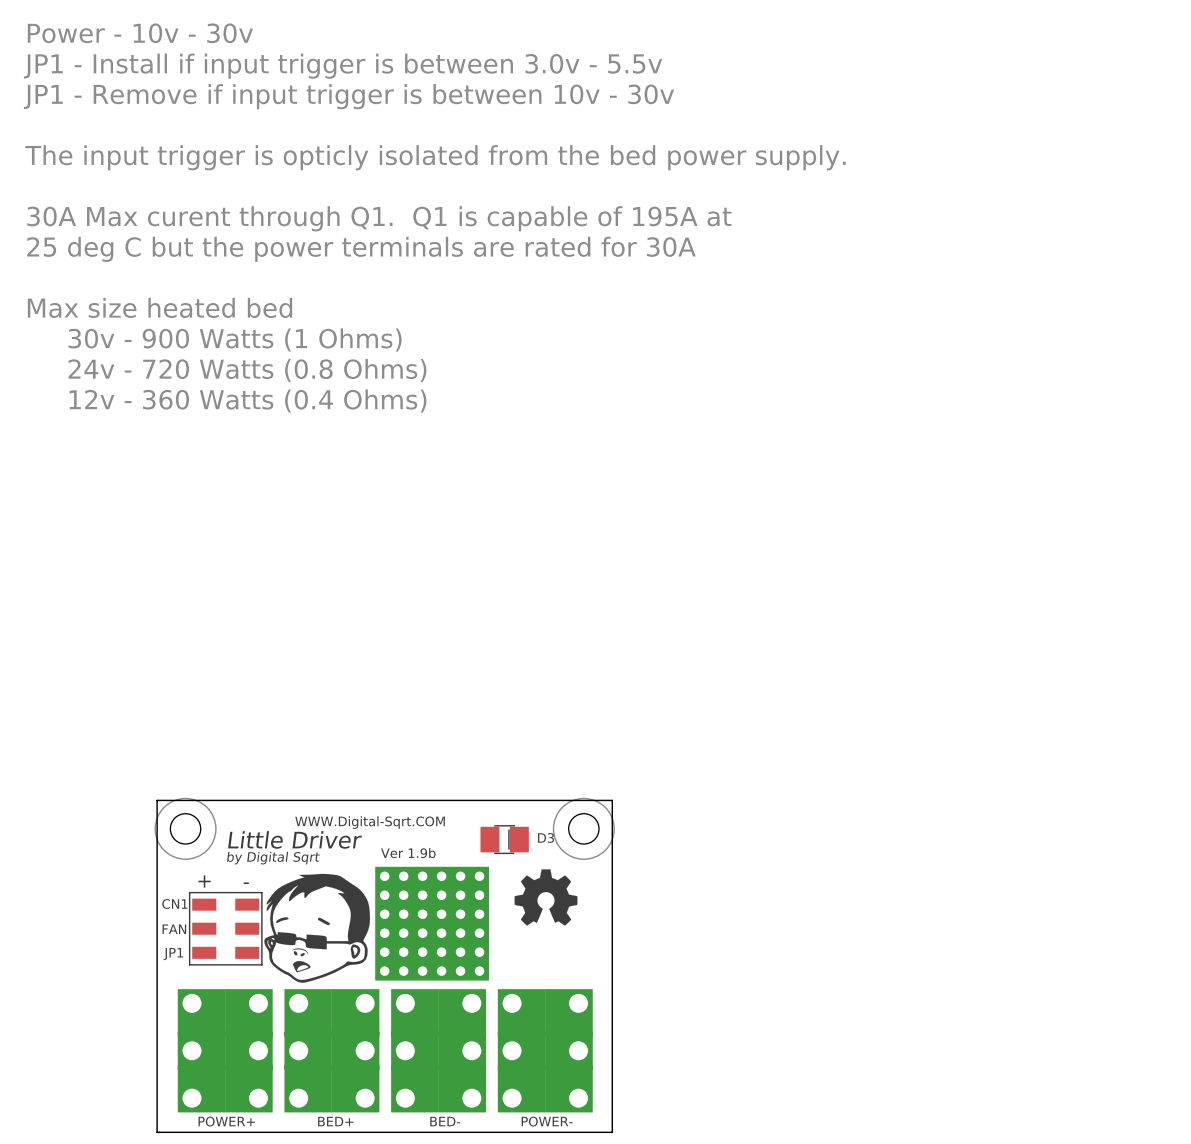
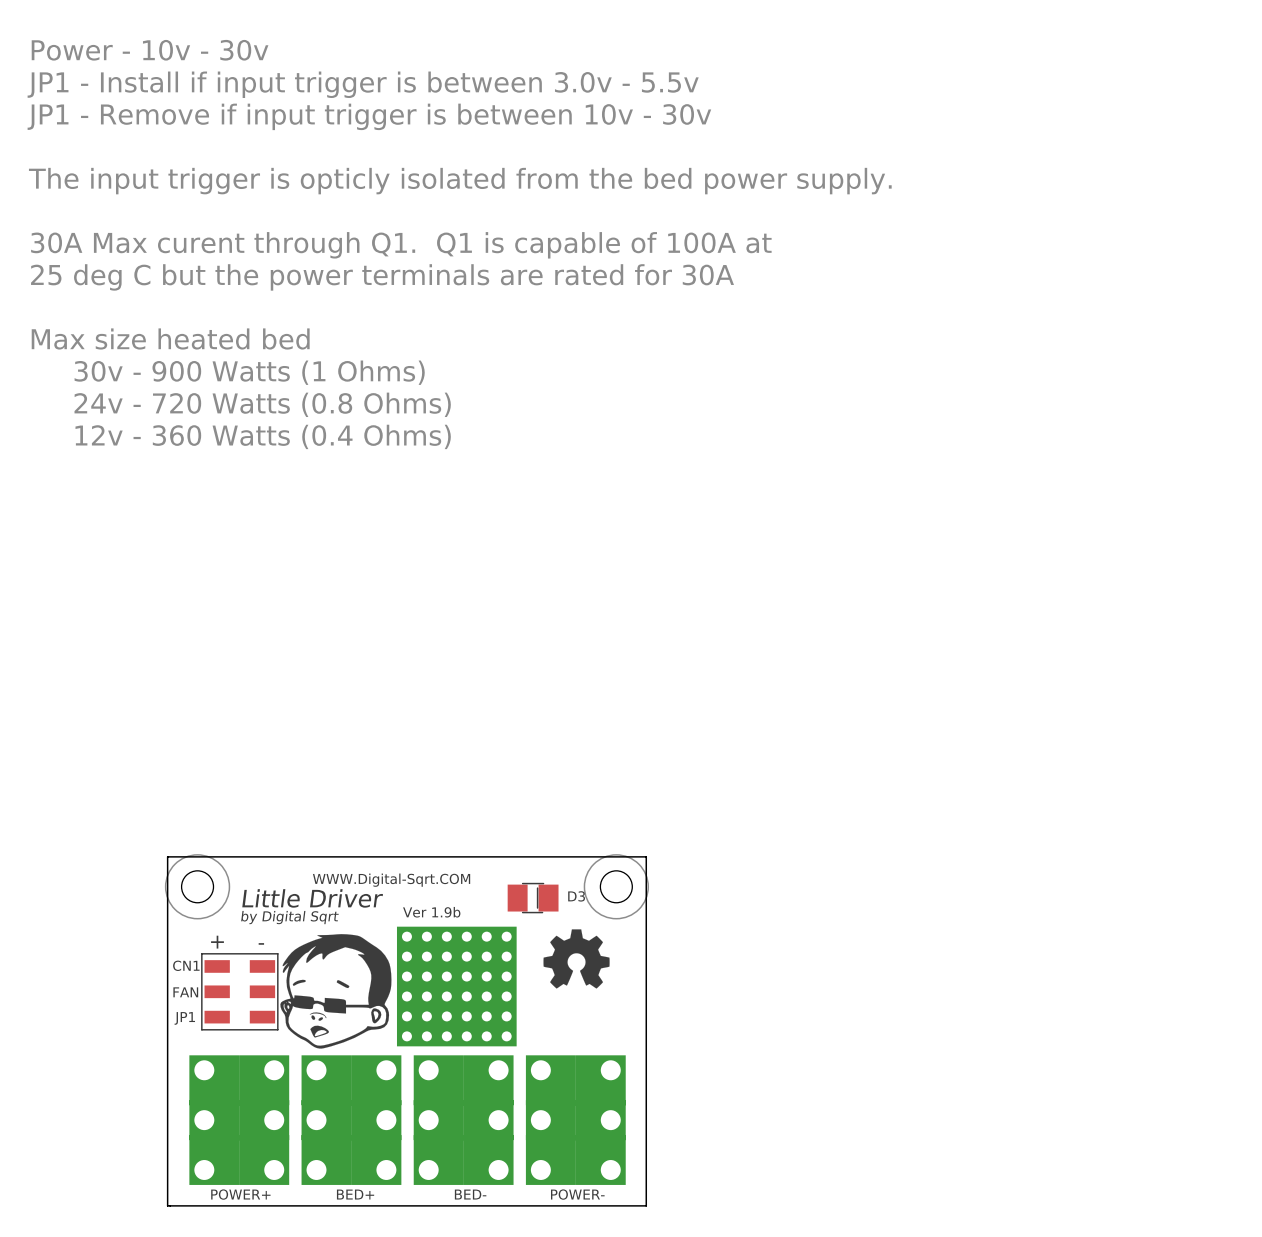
text: 30A Max curent through Q1. Q1 is capable of 195A at (379, 218) -> 30A Max curent through Q1. Q1 is capable of 100A at (401, 245)

